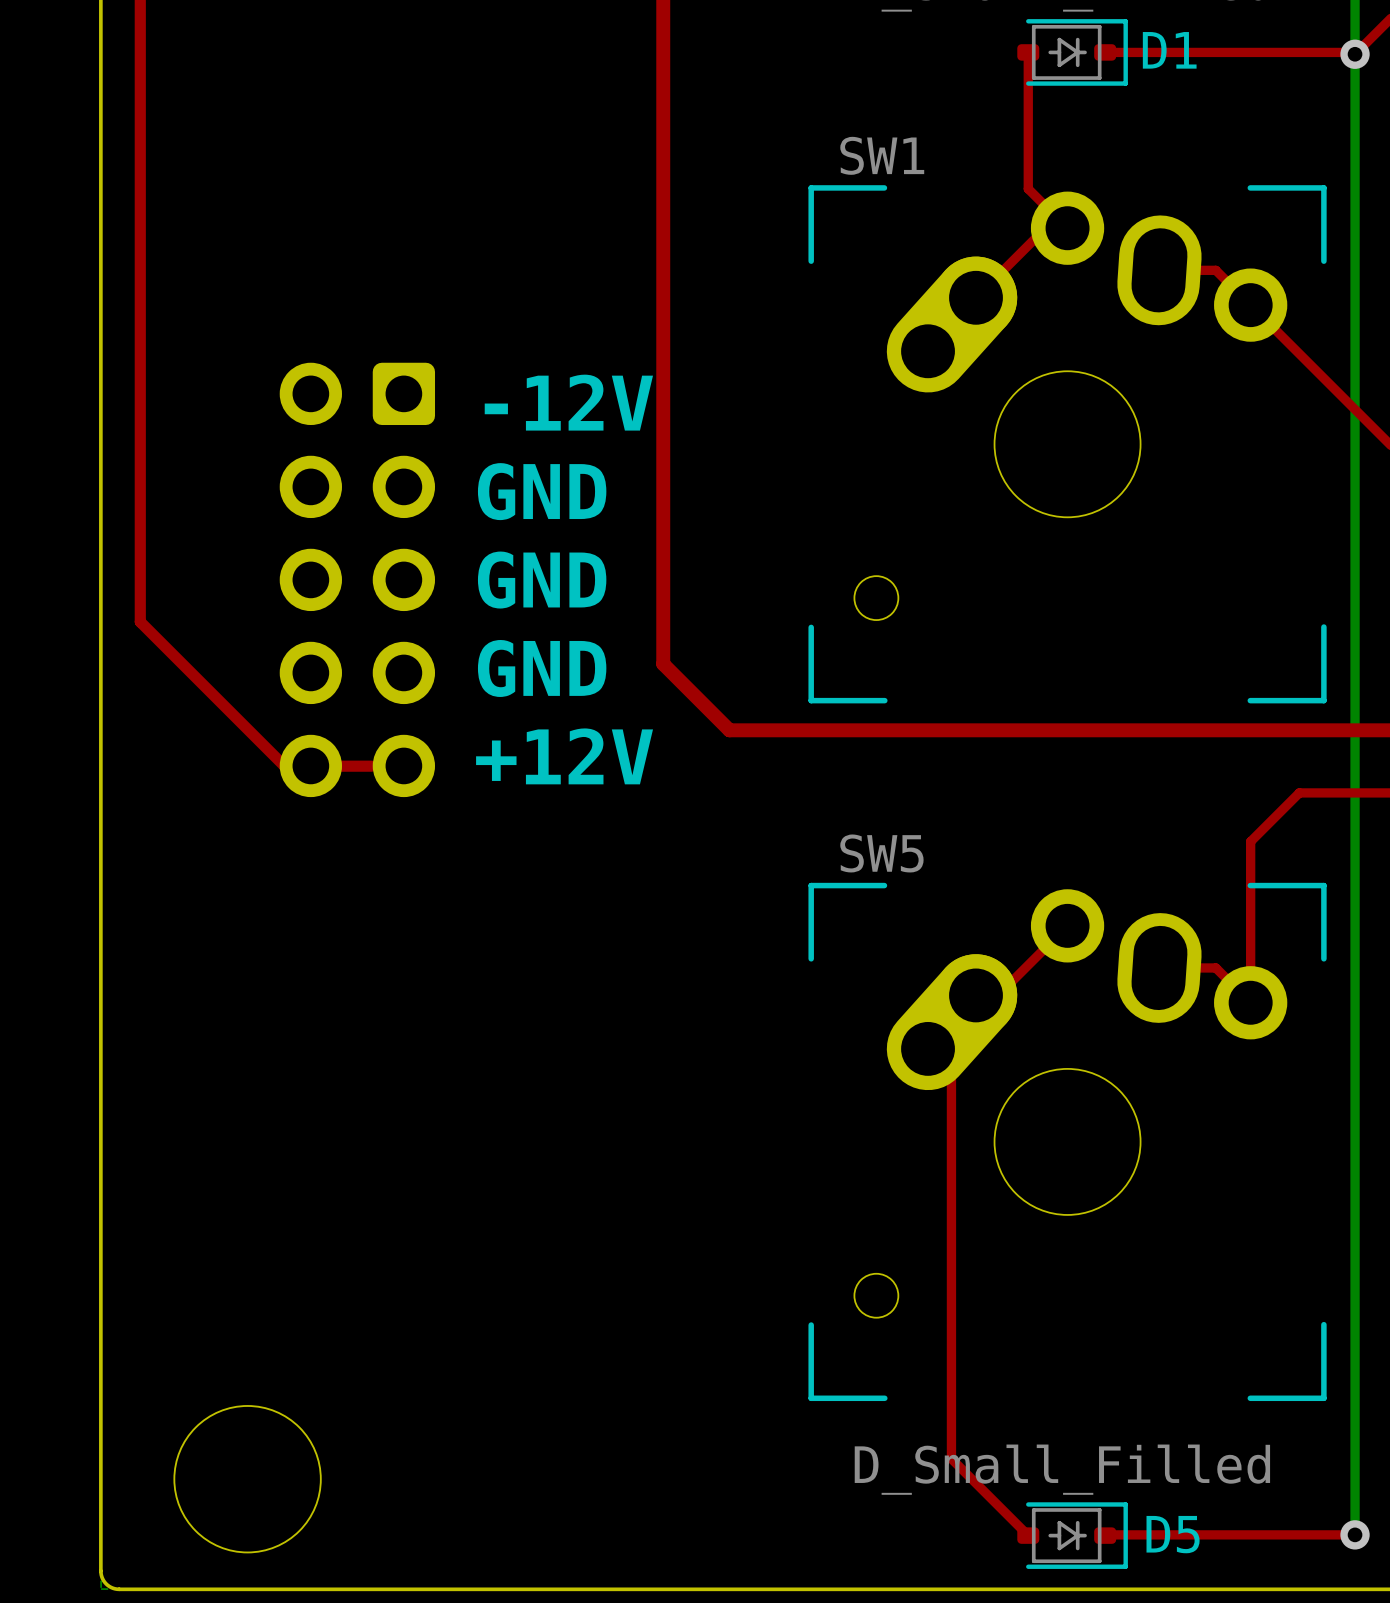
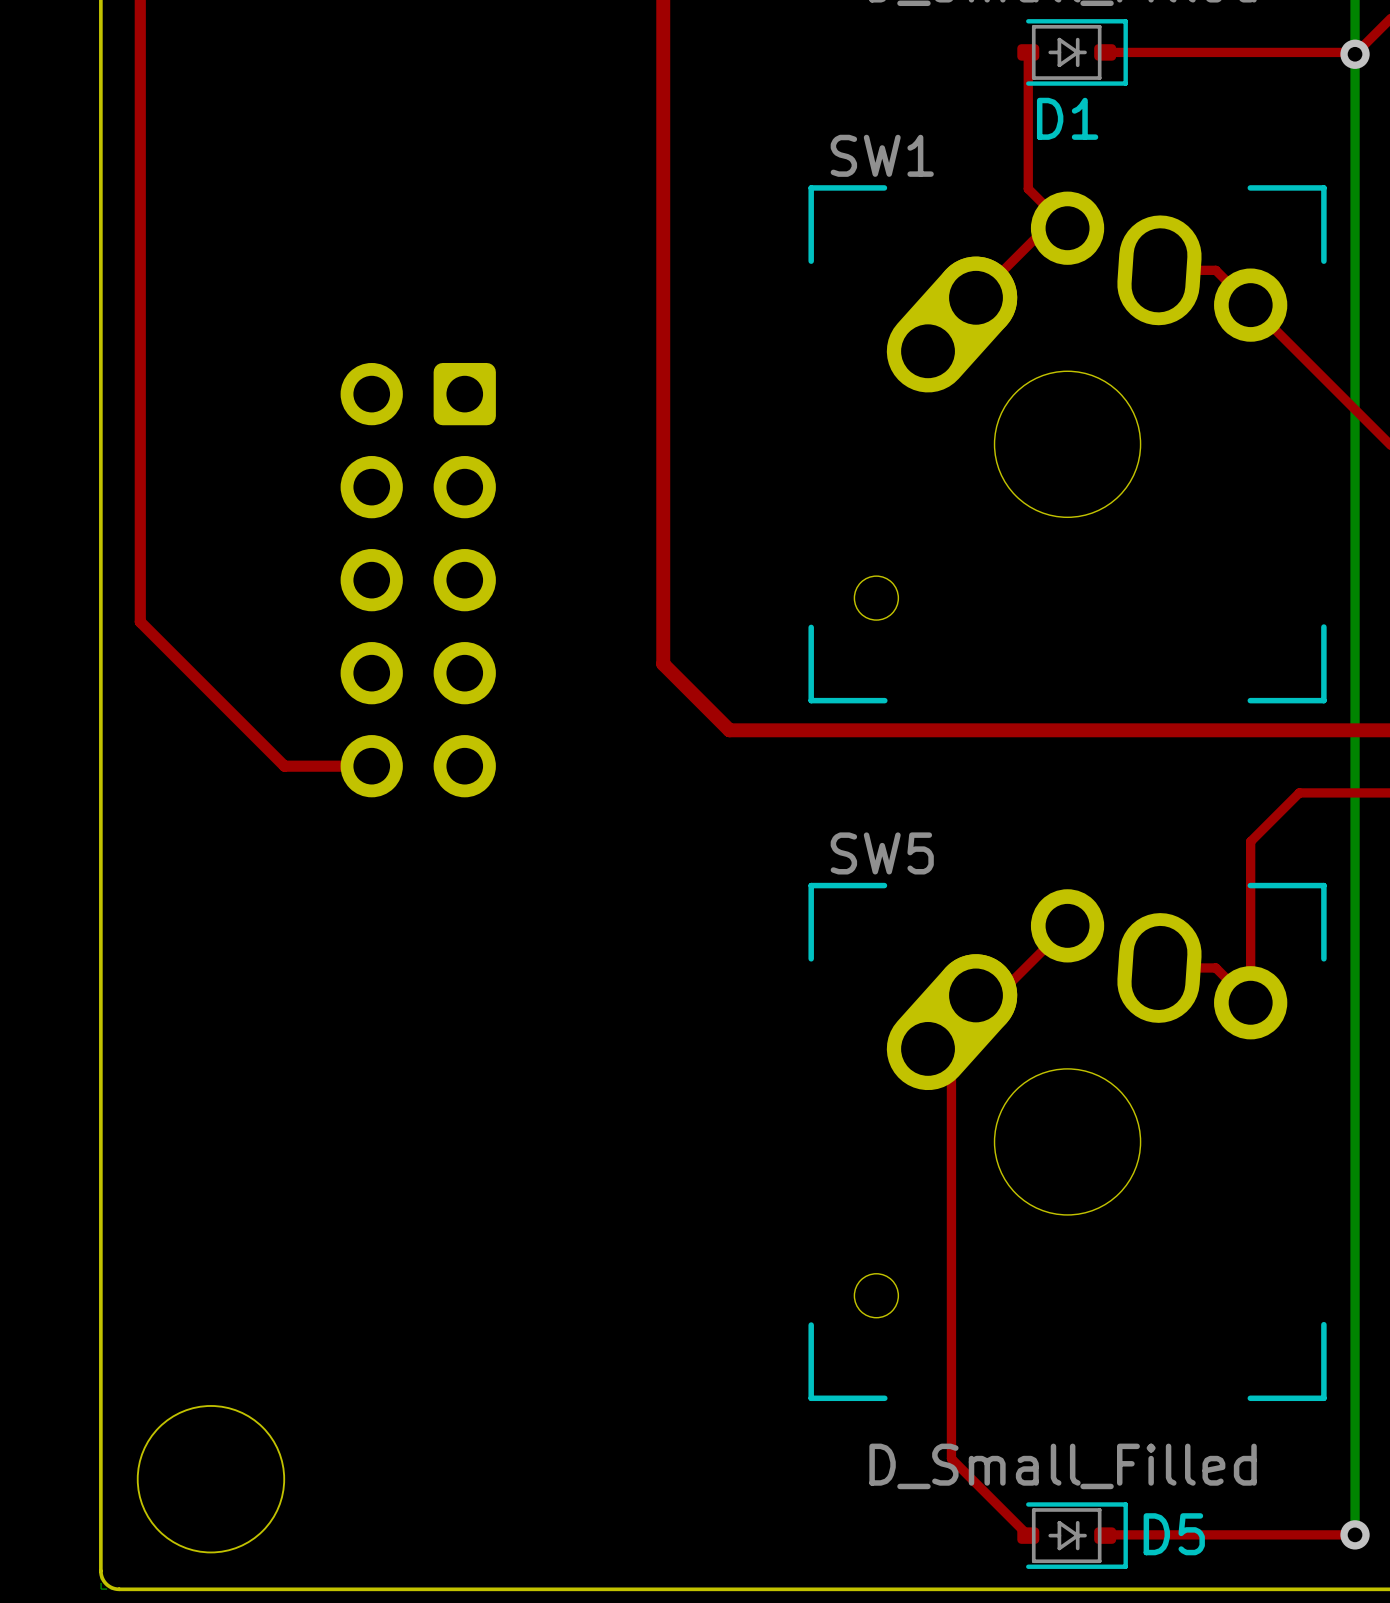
D1 name position: D1 (1169, 50) -> D1 (1067, 118)
text: -12V (568, 402) -> none
text: GND (542, 491) -> none
part position: (357, 579) -> (418, 580)
text: GND (542, 580) -> none
text: GND (542, 668) -> none
text: +12V (564, 756) -> none
round board edge position: (247, 1479) -> (210, 1479)

